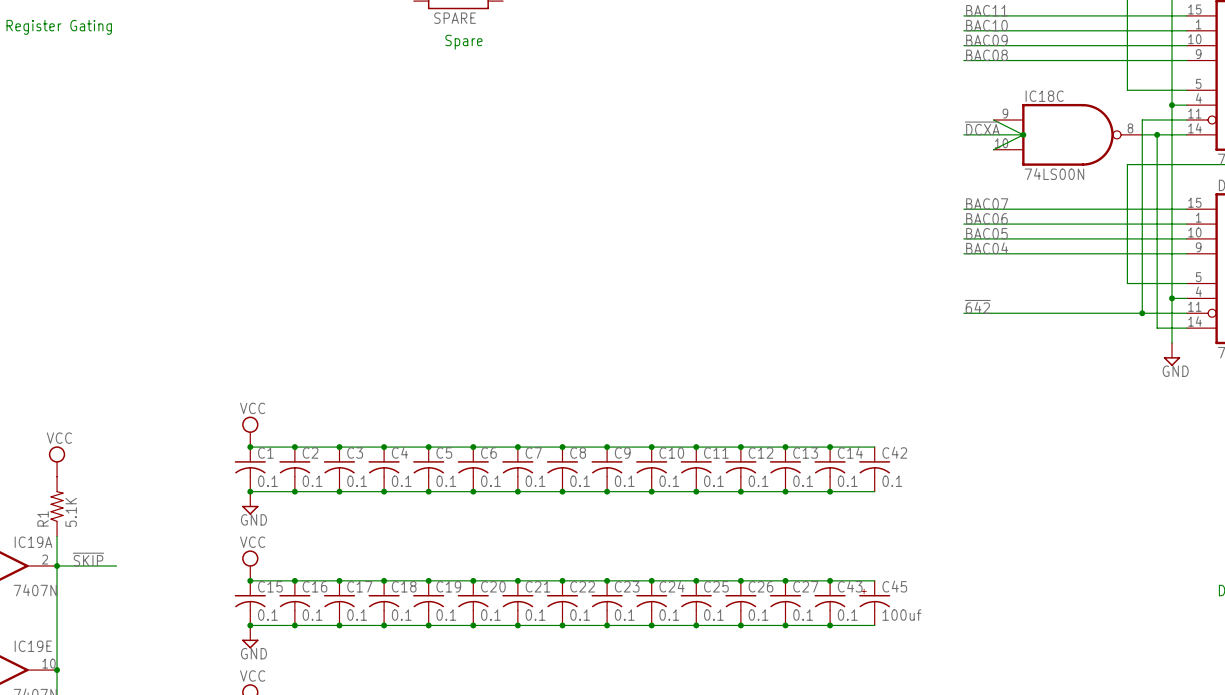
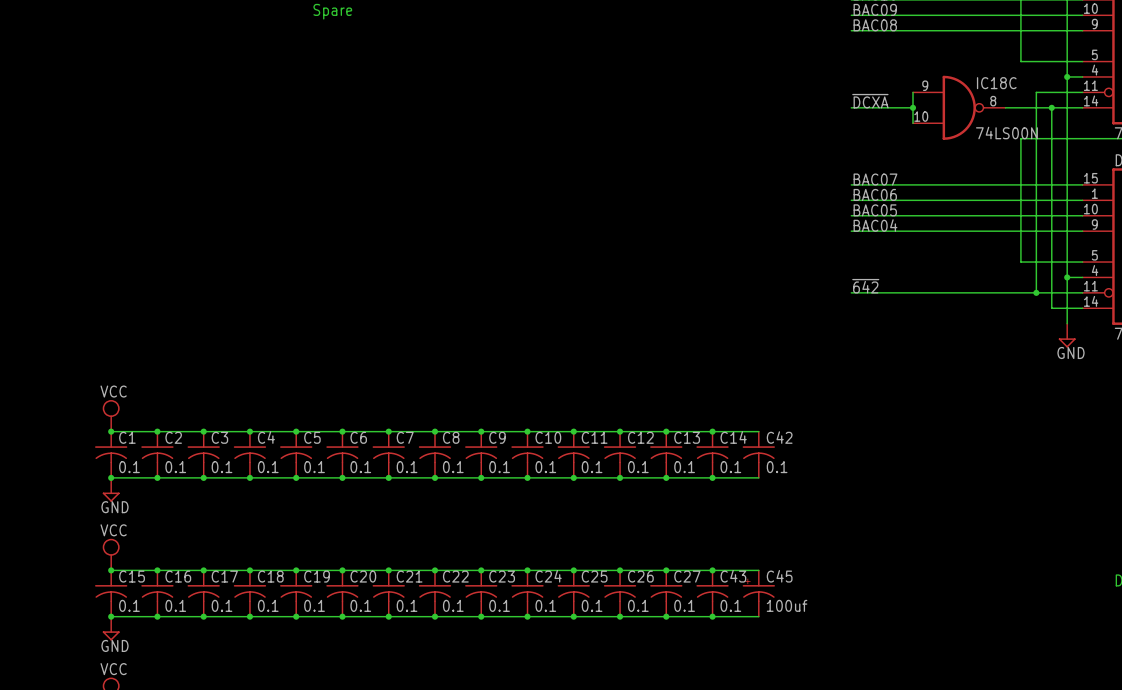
IC18C name position: IC18C (1044, 96) -> IC18C (996, 83)
IC18C symbol: [993, 103, 1143, 166] -> [913, 75, 1006, 140]
wire: (993, 120) (1023, 134) (993, 149) -> none
IC18C value position: 74LS00N (1054, 174) -> 74LS00N (1006, 133)

